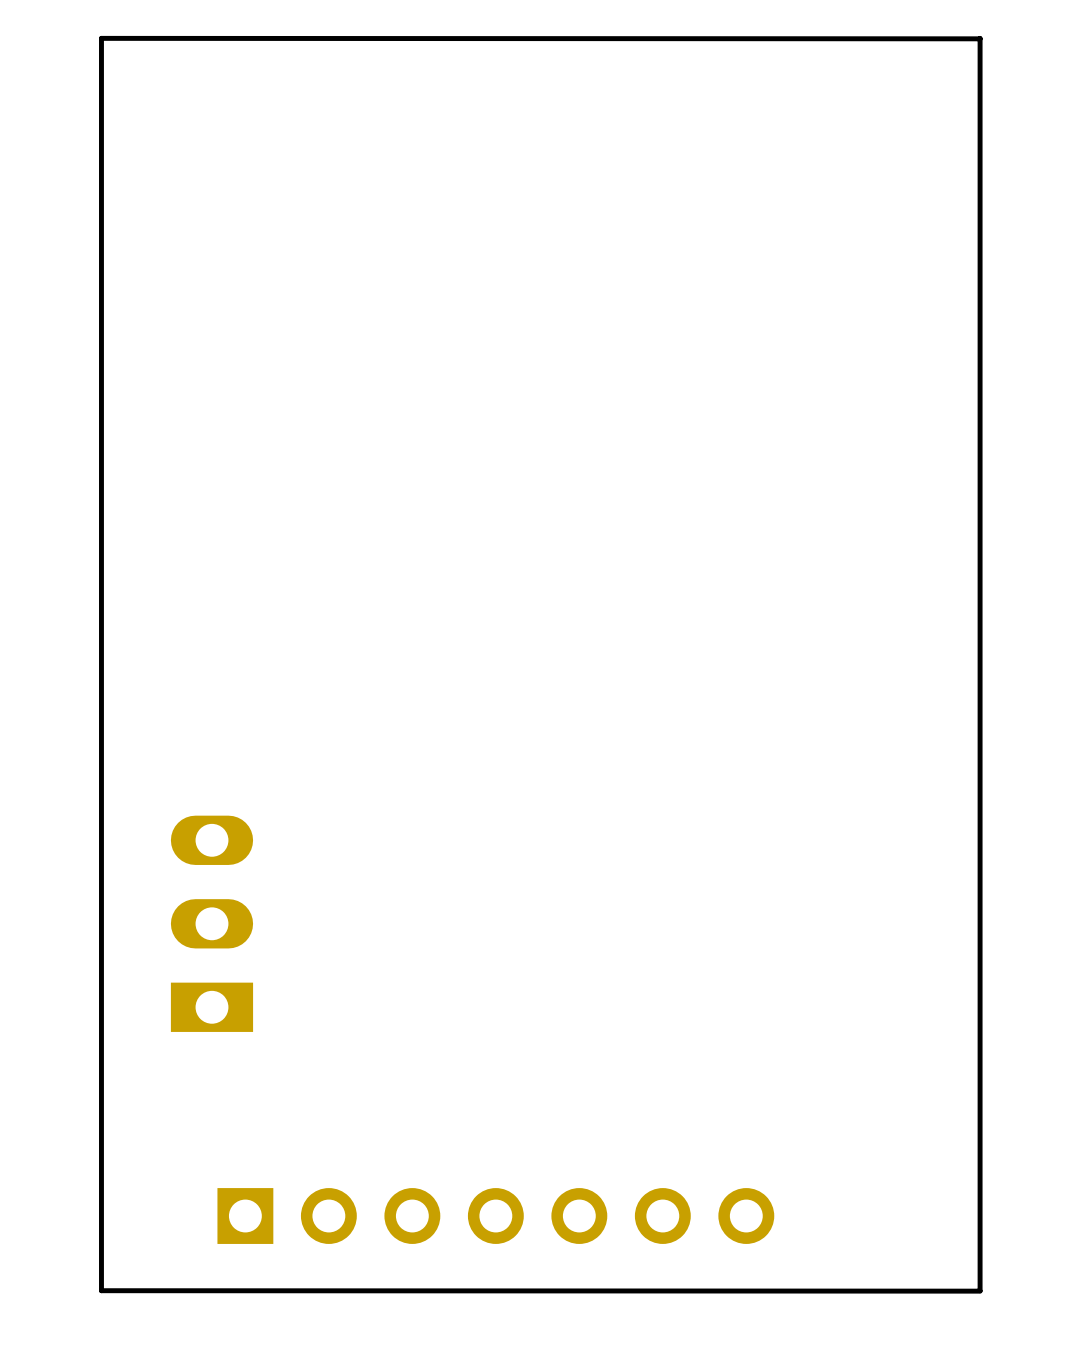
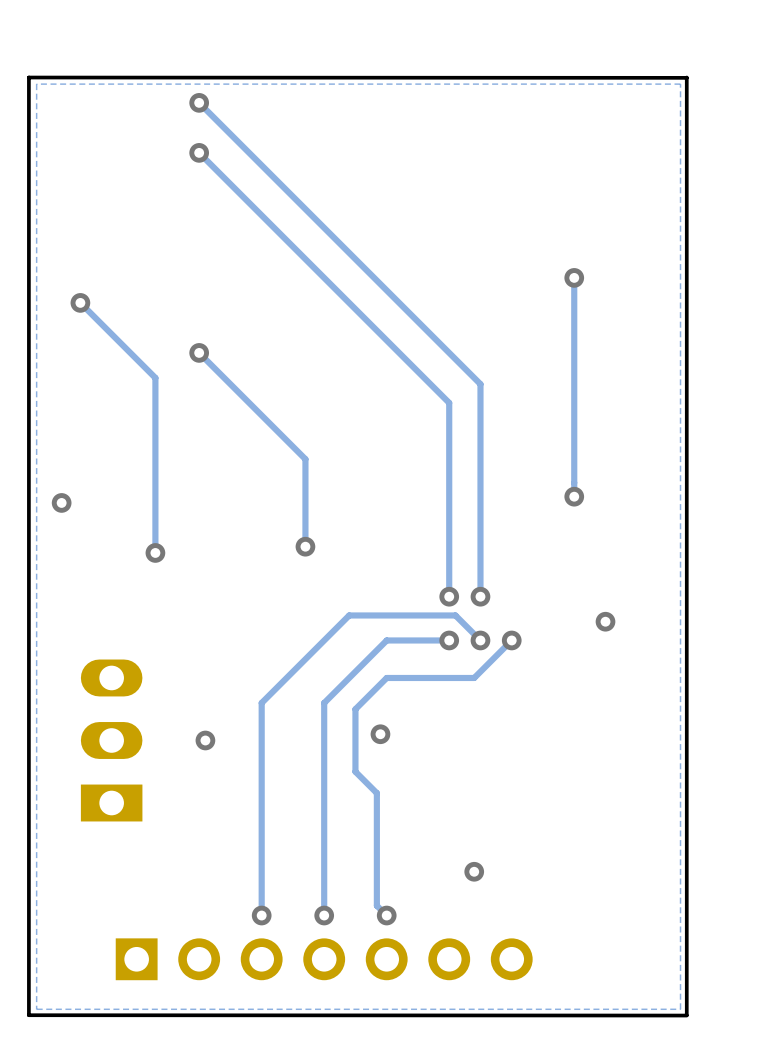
zone outline: none -> (680, 84) (36, 84) (36, 1009) (680, 1009) (680, 84)
track: none -> (199, 102) (480, 384) (480, 596)
via: none -> (199, 102)
track: none -> (199, 152) (449, 402) (449, 596)
via: none -> (199, 152)
track: none -> (574, 277) (574, 496)
via: none -> (574, 277)
track: none -> (80, 302) (155, 377) (155, 552)
via: none -> (80, 302)
track: none -> (199, 352) (305, 459) (305, 546)
via: none -> (199, 352)
via: none -> (574, 496)
via: none -> (61, 502)
via: none -> (305, 546)
via: none -> (155, 552)
via: none -> (449, 596)
via: none -> (480, 596)
via: none -> (605, 621)
track: none -> (449, 640) (386, 640) (324, 702) (324, 915)
via: none -> (449, 640)
track: none -> (480, 640) (455, 615) (349, 615) (261, 702) (261, 915)
via: none -> (480, 640)
track: none -> (511, 640) (474, 677) (386, 677) (355, 709) (355, 771) (376, 793) (376, 905) (386, 915)
via: none -> (511, 640)
via: none -> (380, 734)
via: none -> (205, 740)
via: none -> (474, 871)
via: none -> (261, 915)
via: none -> (324, 915)
via: none -> (386, 915)

